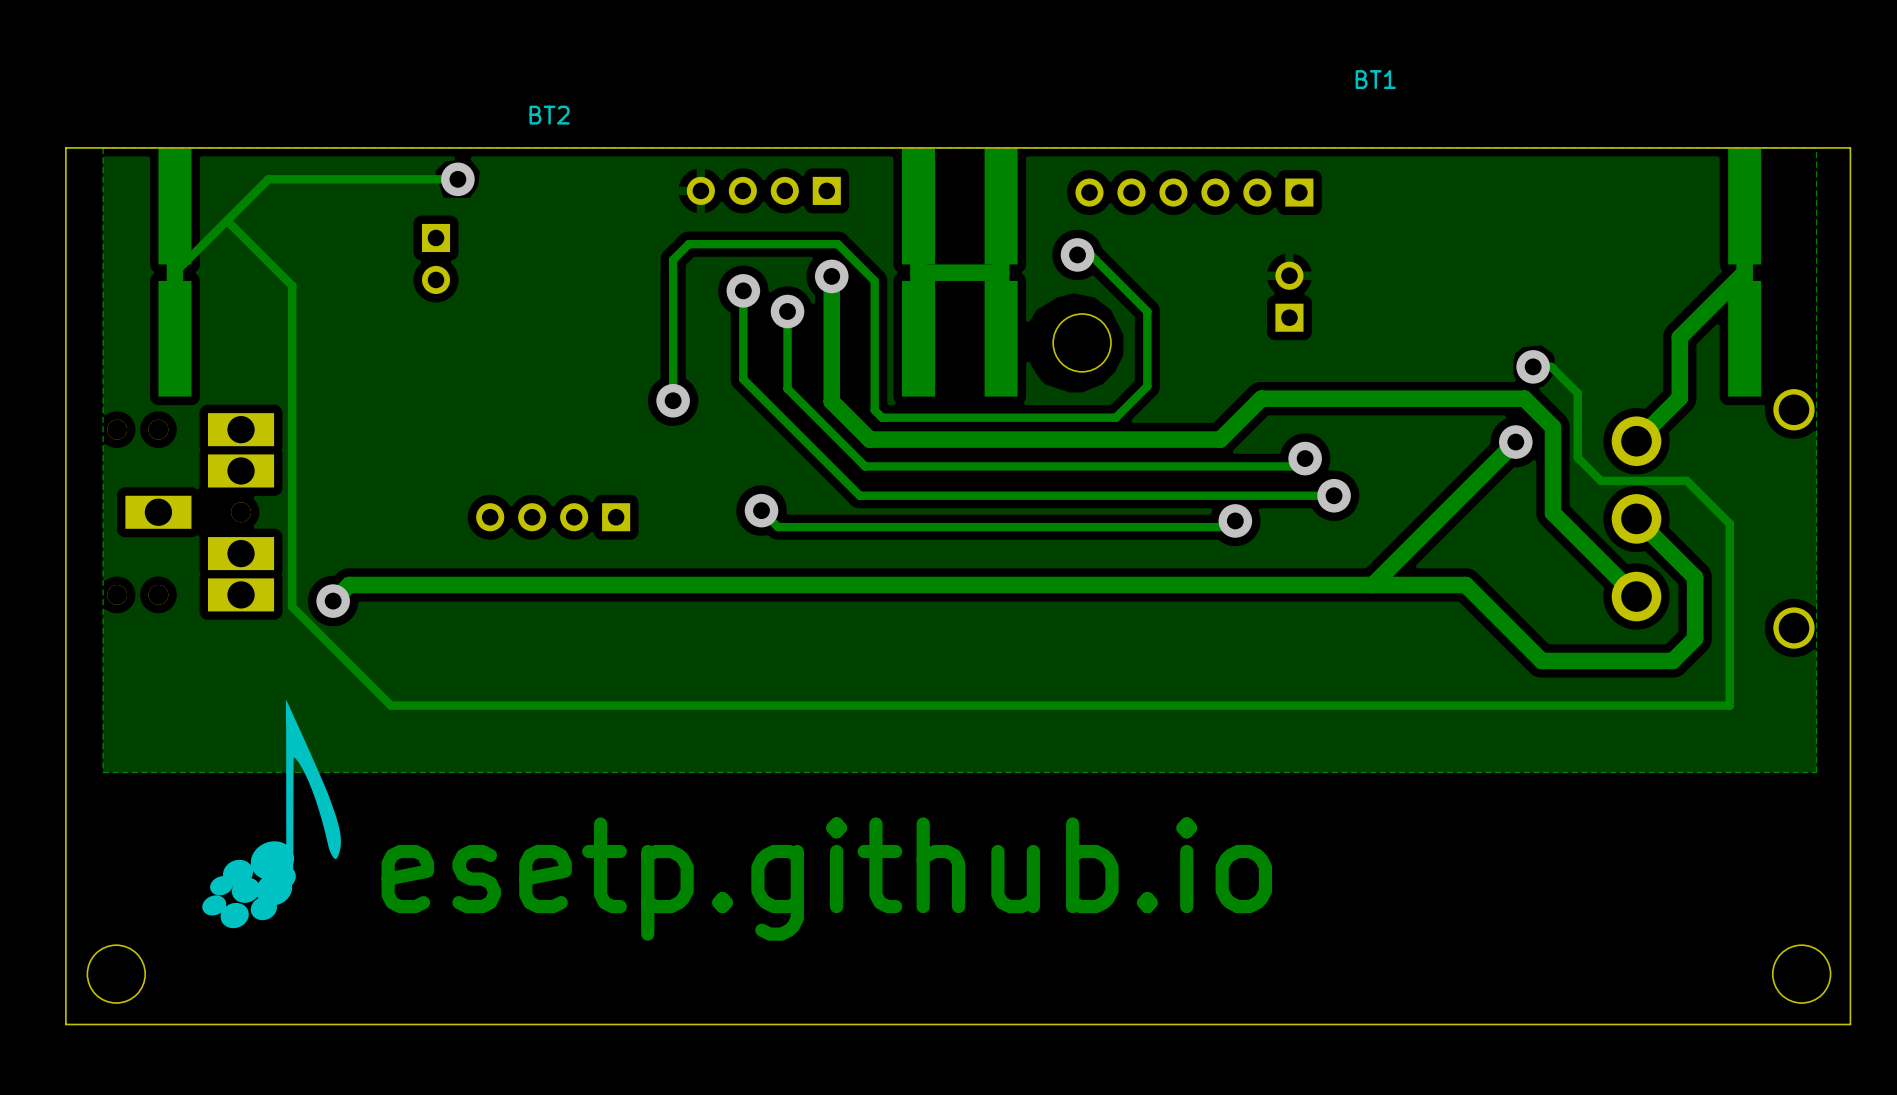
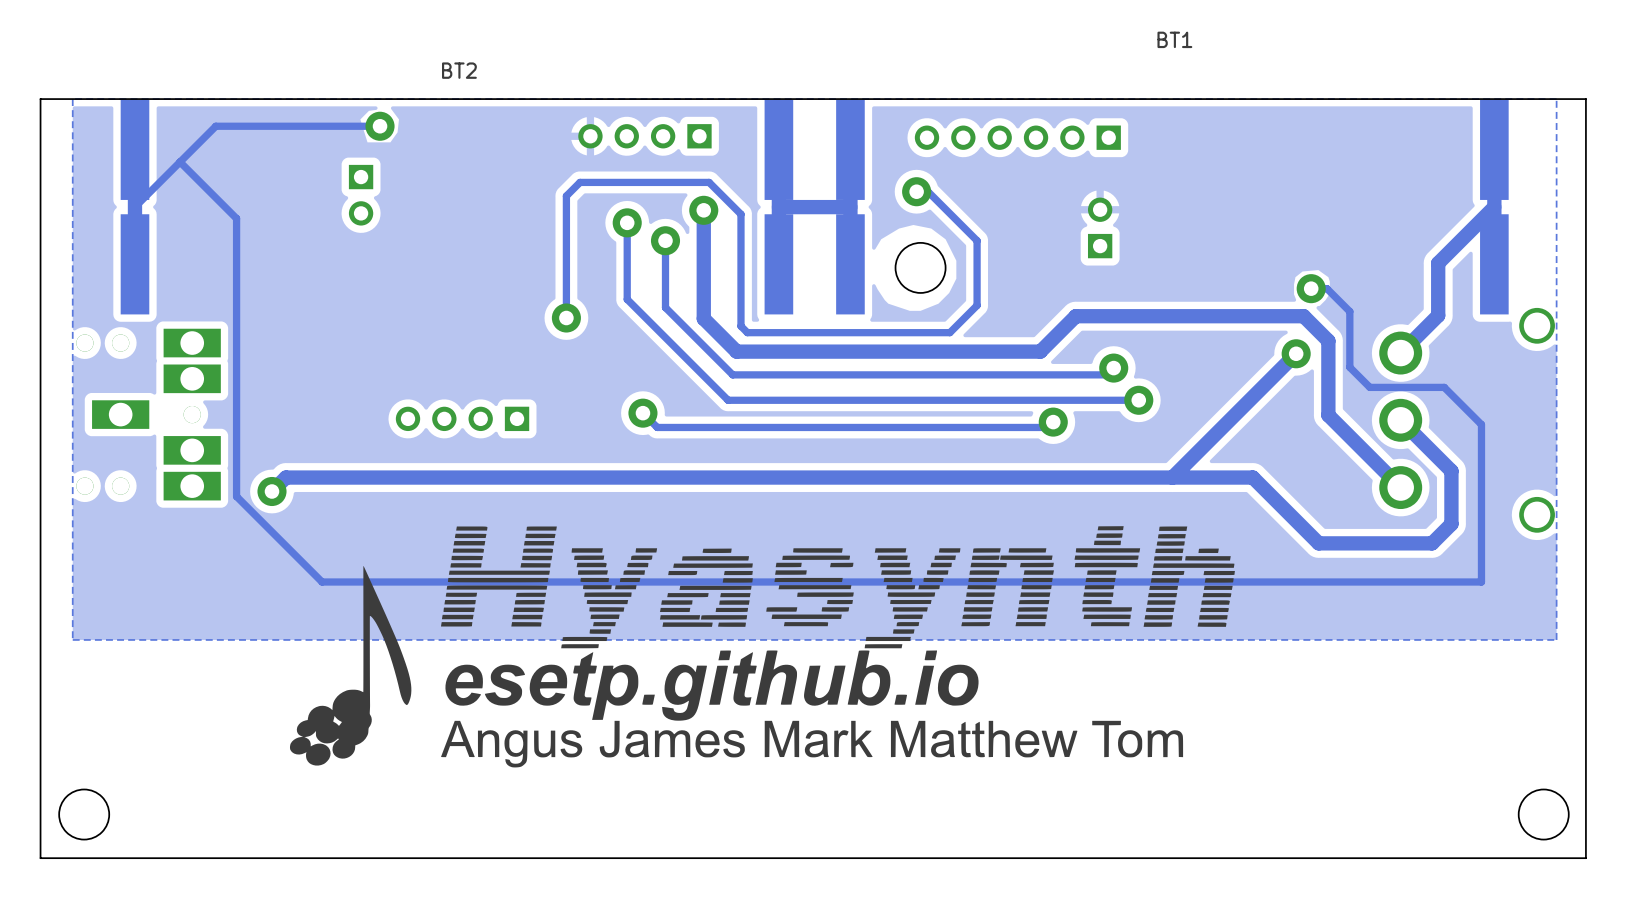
drawing: none -> [289, 526, 1235, 768]
drawing: [202, 699, 341, 929] -> none
text: esetp.github.io (826, 879) -> none

